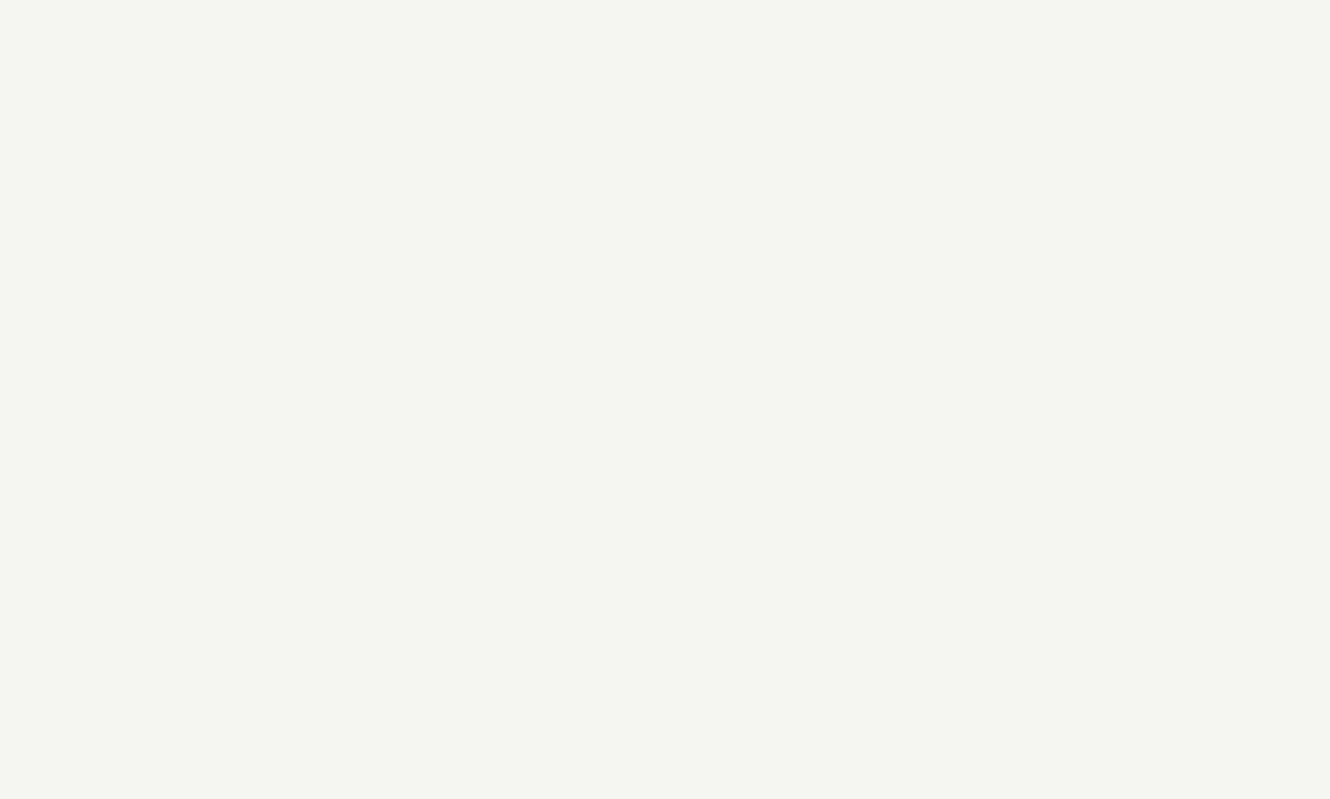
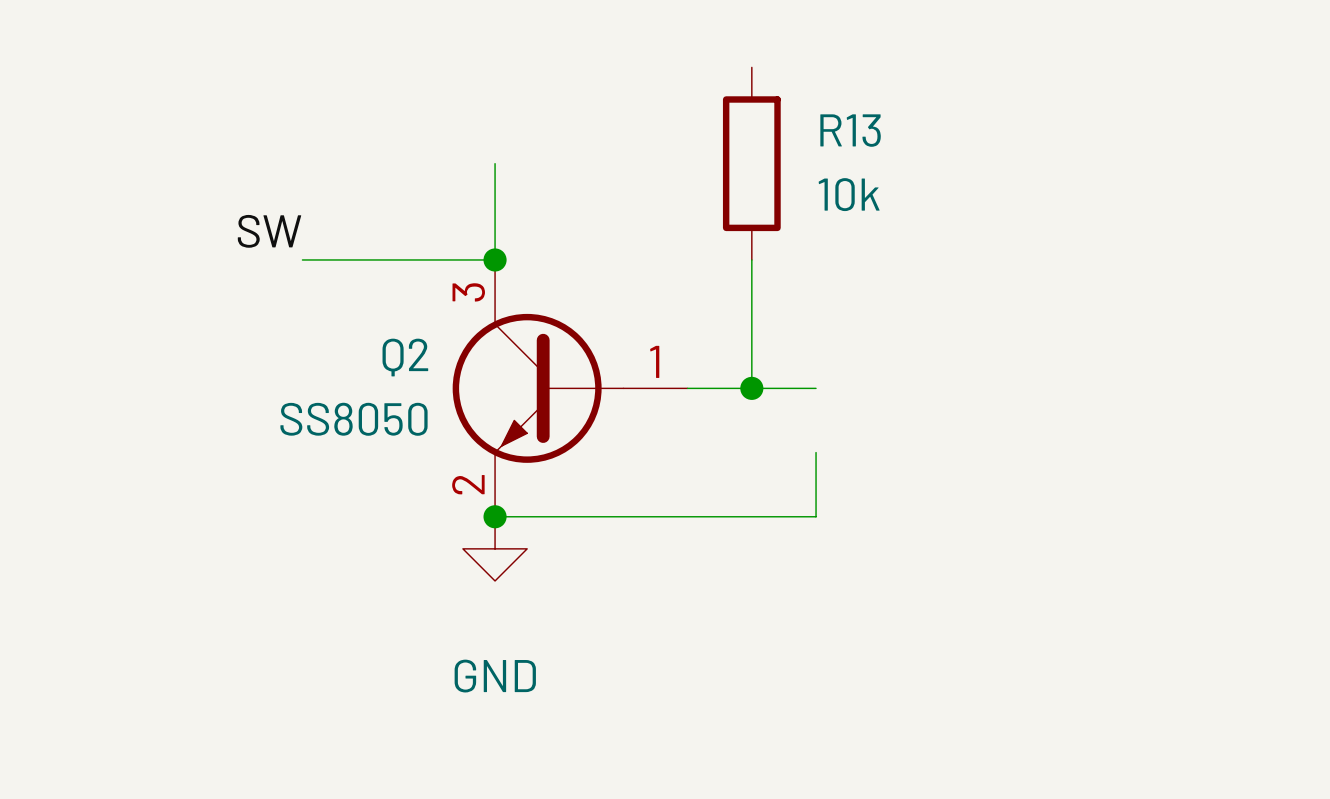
wire: none -> (495, 163) (495, 259) (302, 259)
R13: none -> 10k (751, 163)
label: none -> SW (269, 231)
junction: none -> (495, 259)
wire: none -> (751, 259) (751, 388)
Q2: none -> SS8050 (570, 388)
wire: none -> (687, 388) (816, 388)
junction: none -> (751, 388)
wire: none -> (816, 452) (816, 516) (495, 516)
junction: none -> (495, 516)
power symbol: none -> GND (495, 548)

